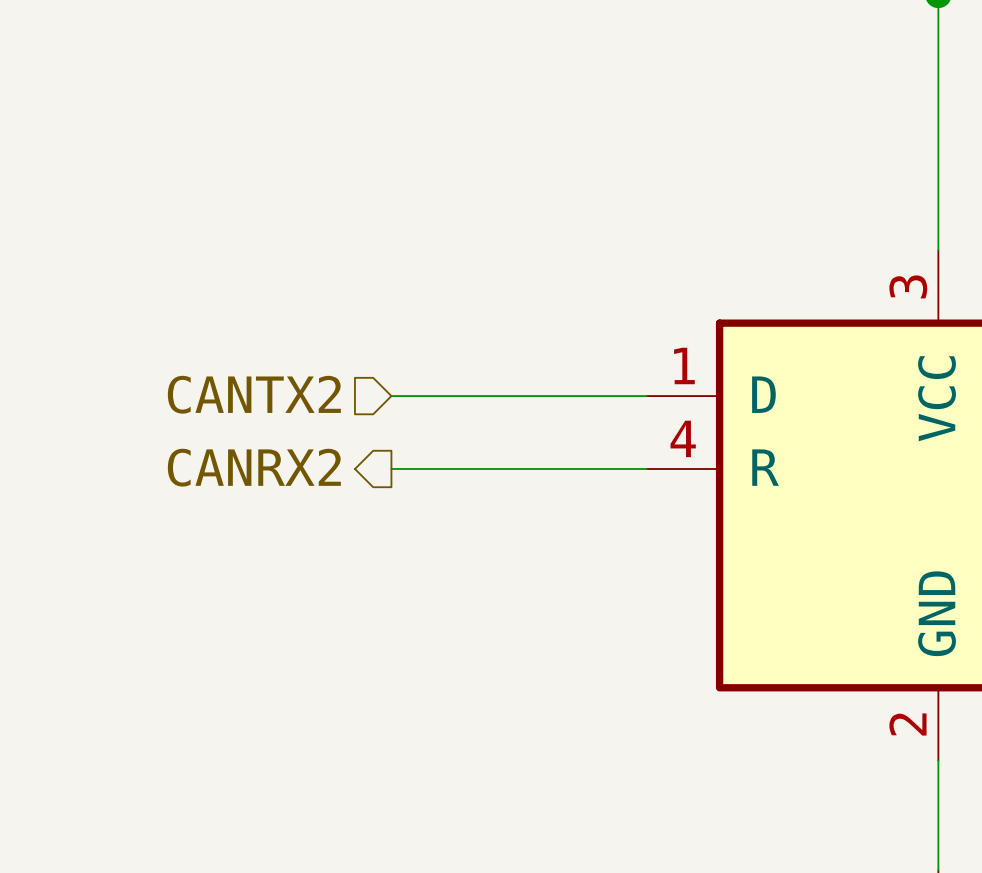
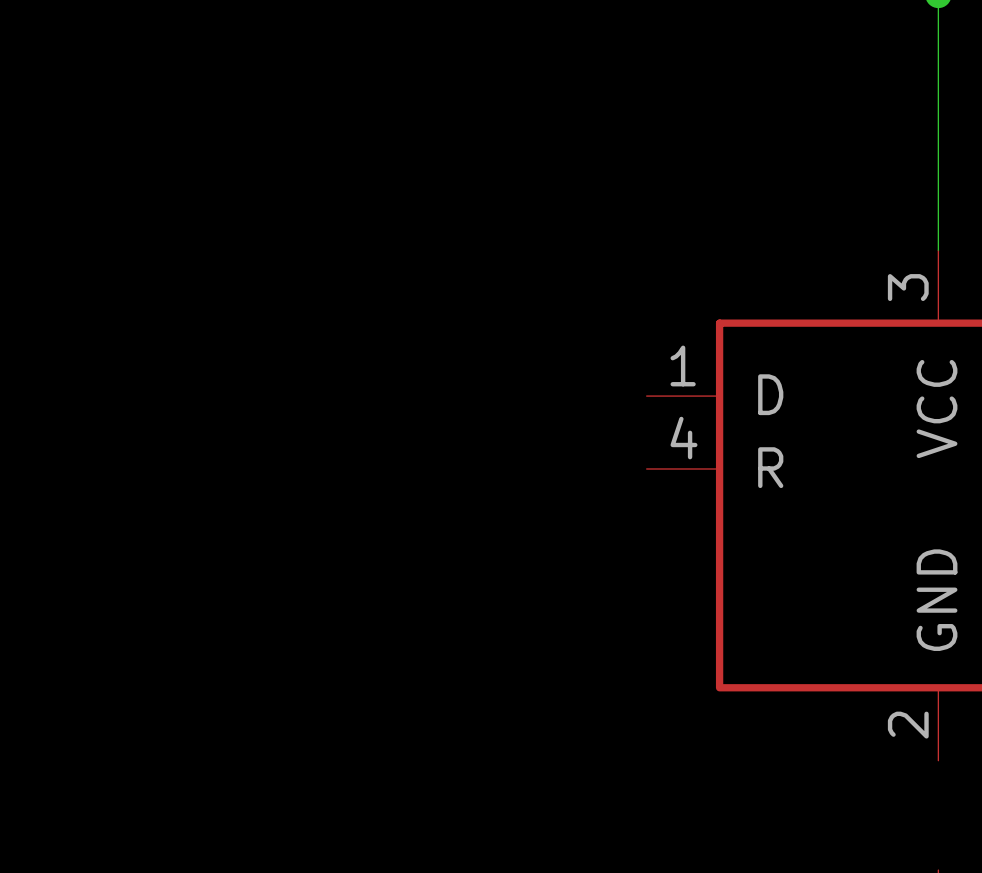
hierarchical label: CANTX2 (254, 394) -> none
wire: (391, 396) (646, 396) -> none
hierarchical label: CANRX2 (254, 467) -> none
wire: (391, 468) (646, 468) -> none
wire: (938, 760) (938, 870) -> none

